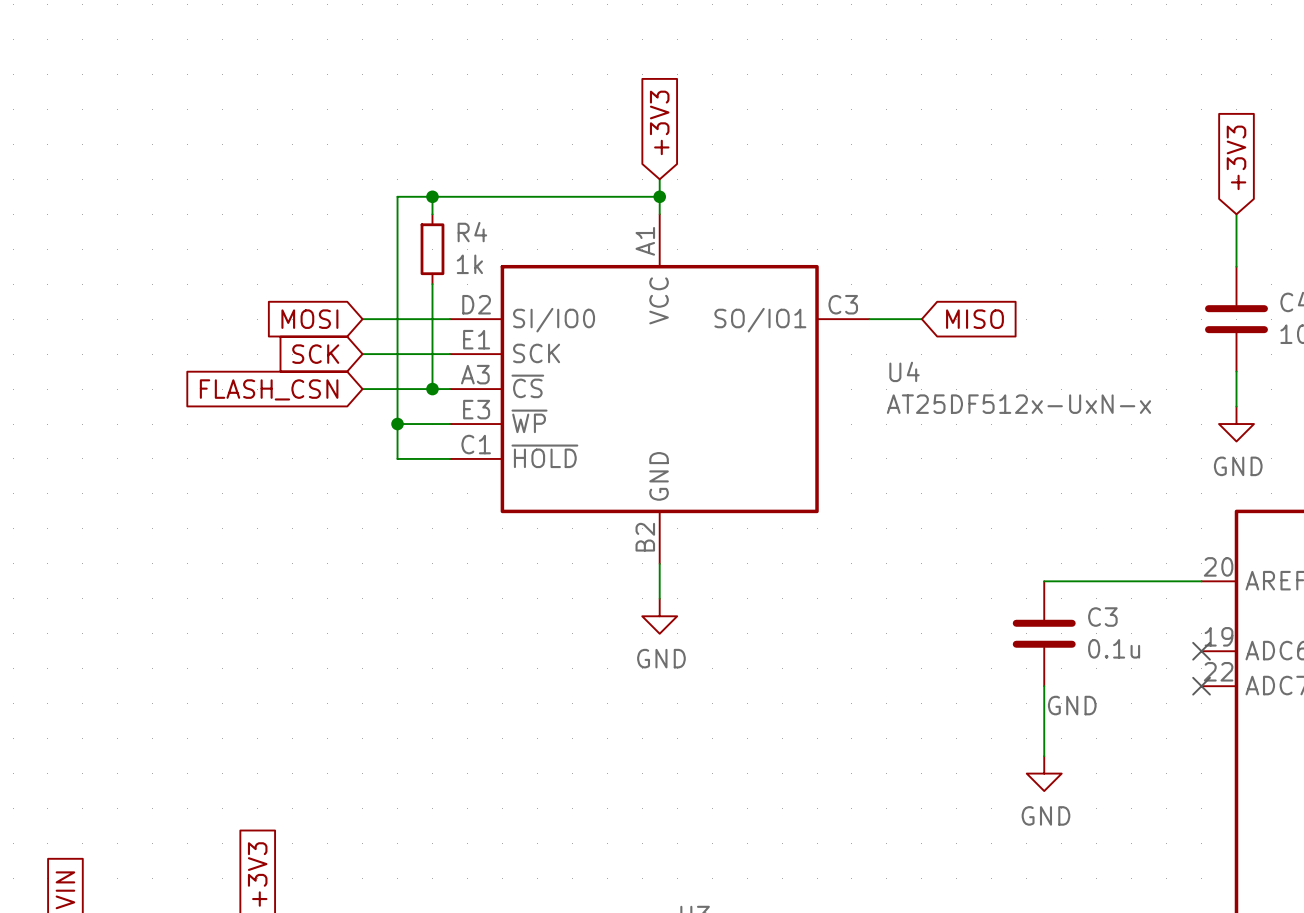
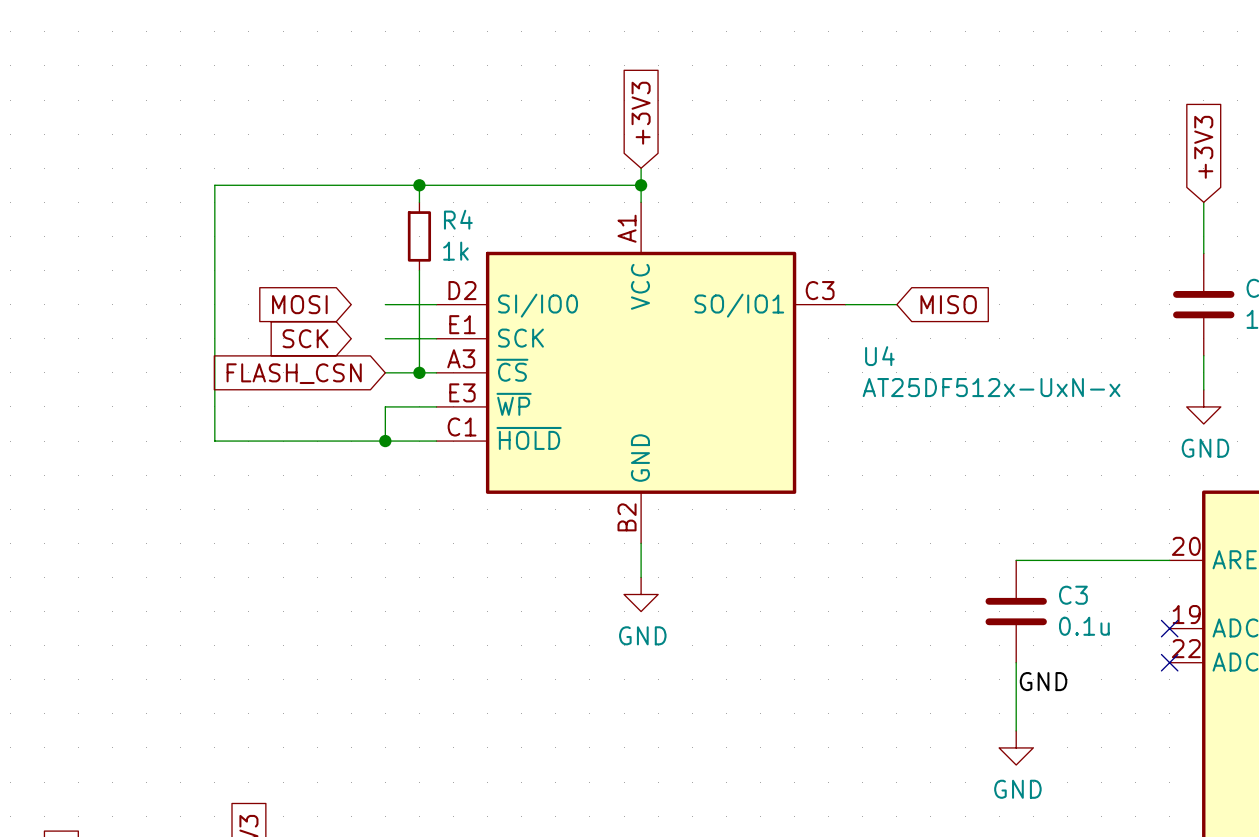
wire: (397, 196) (397, 424) -> (385, 185) (214, 185) (214, 441) (385, 441)
wire: (362, 319) (397, 319) -> none
wire: (362, 354) (397, 354) -> none
global label position: FLASH_CSN (269, 389) -> FLASH_CSN (294, 373)
wire: (362, 389) (397, 389) -> none
junction position: (397, 424) -> (385, 441)

